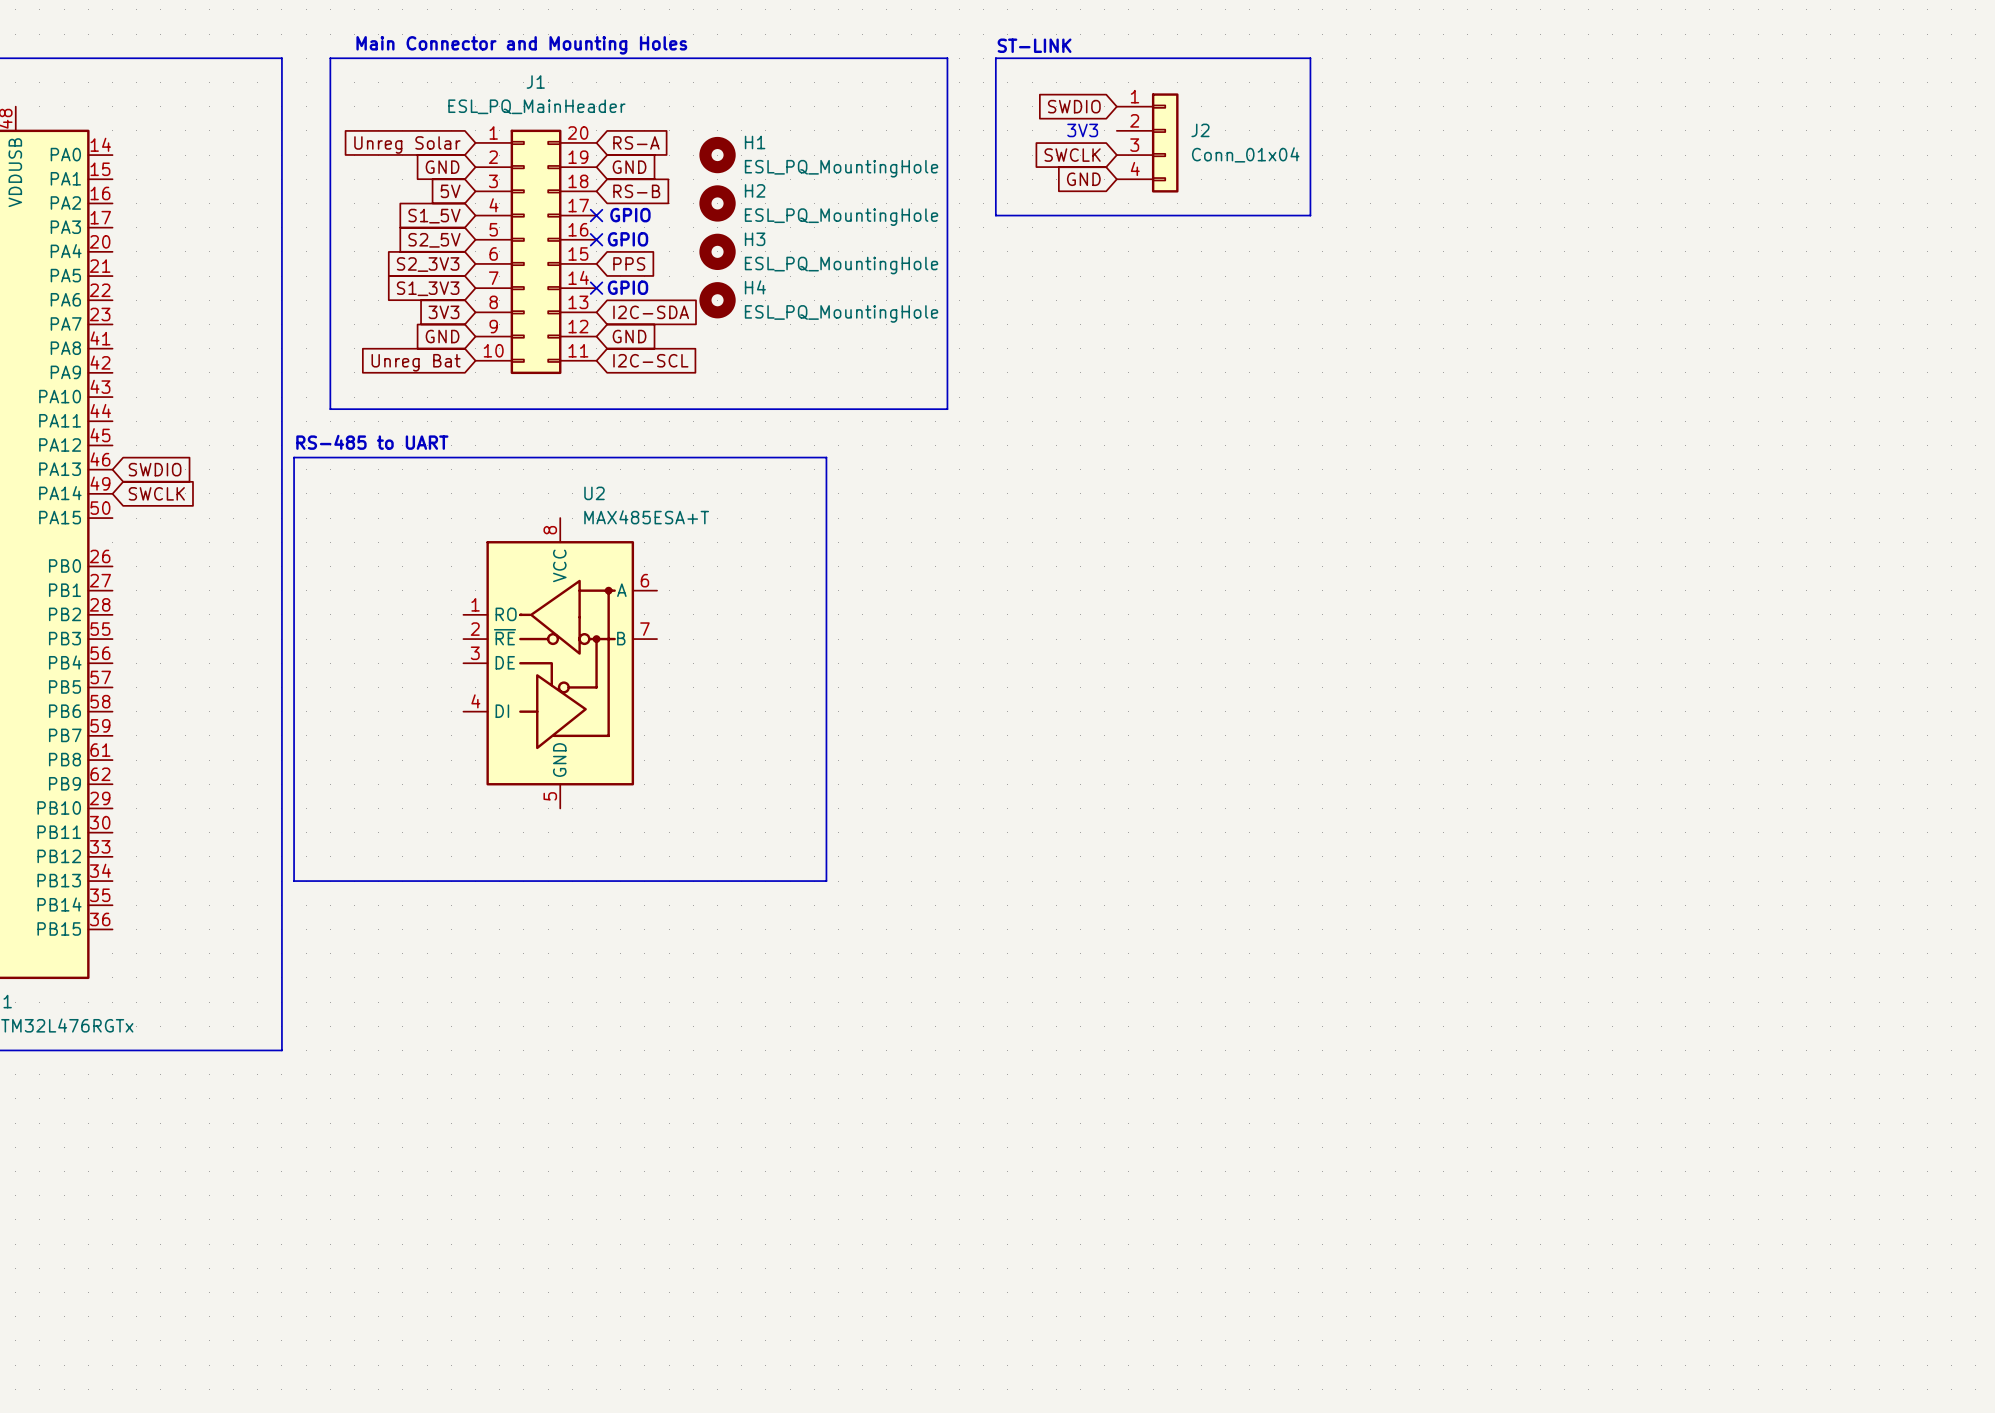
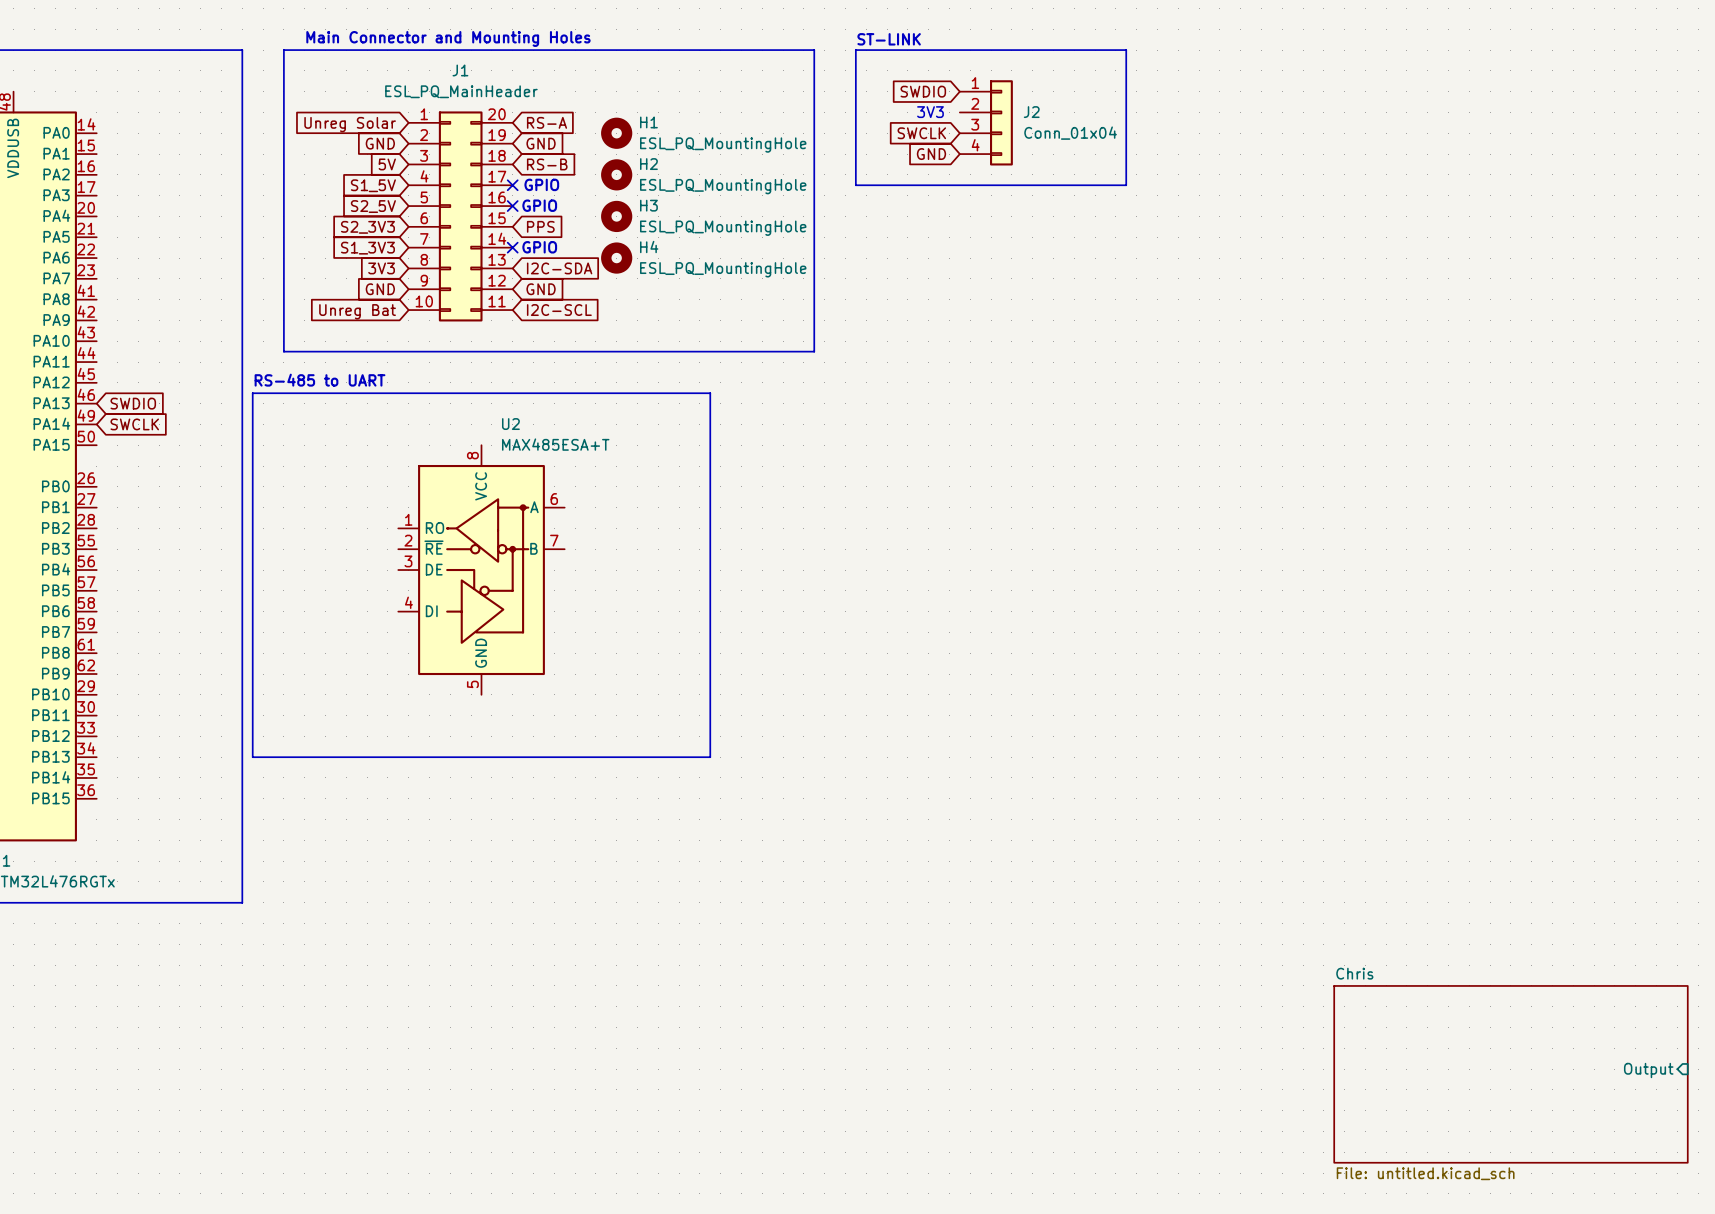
sheet pin: none -> Output (1648, 1070)
sheet Chris: none -> File: untitled.kicad_sch (1510, 1074)

